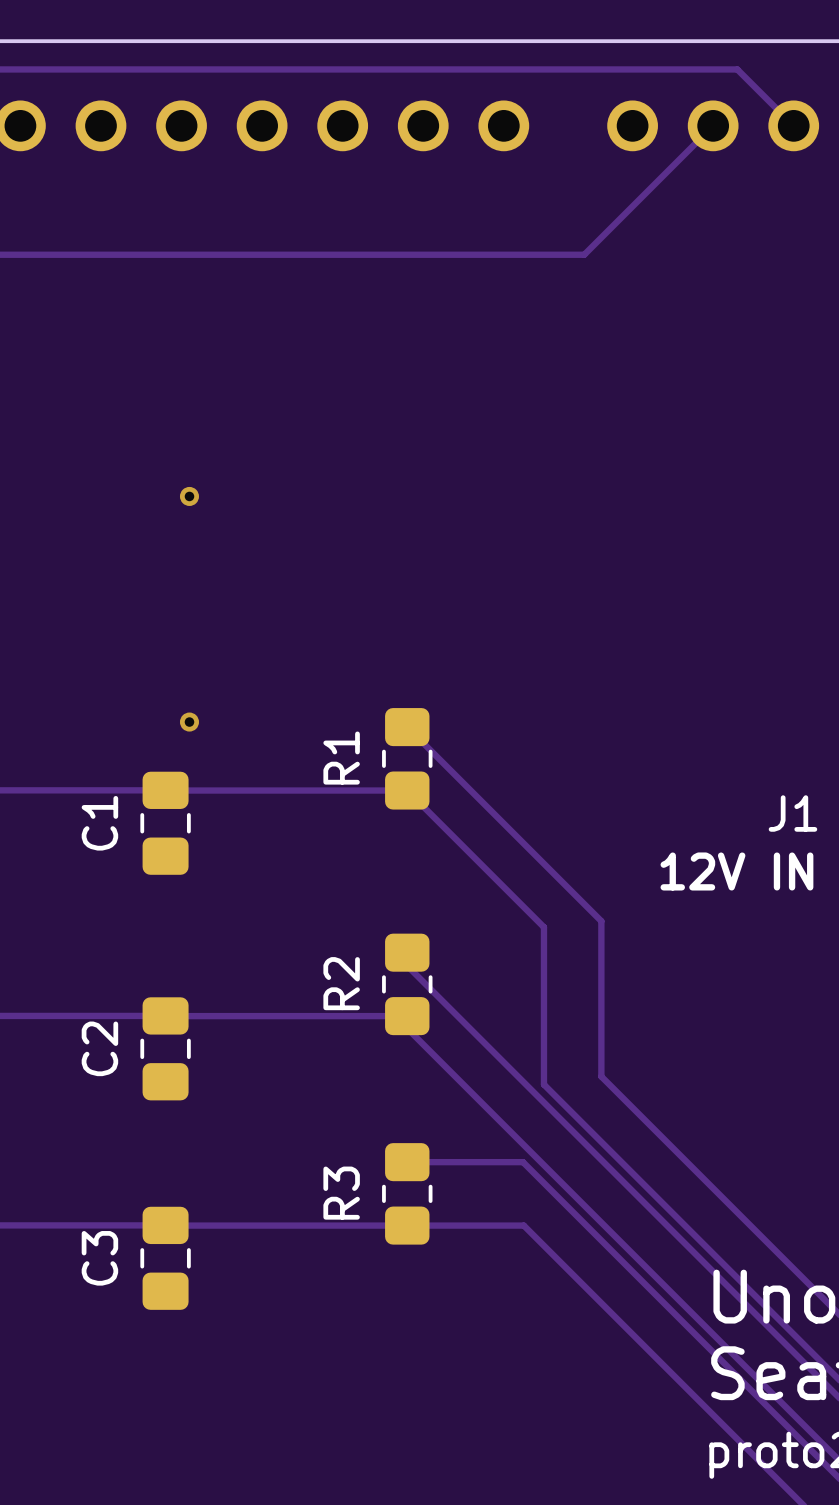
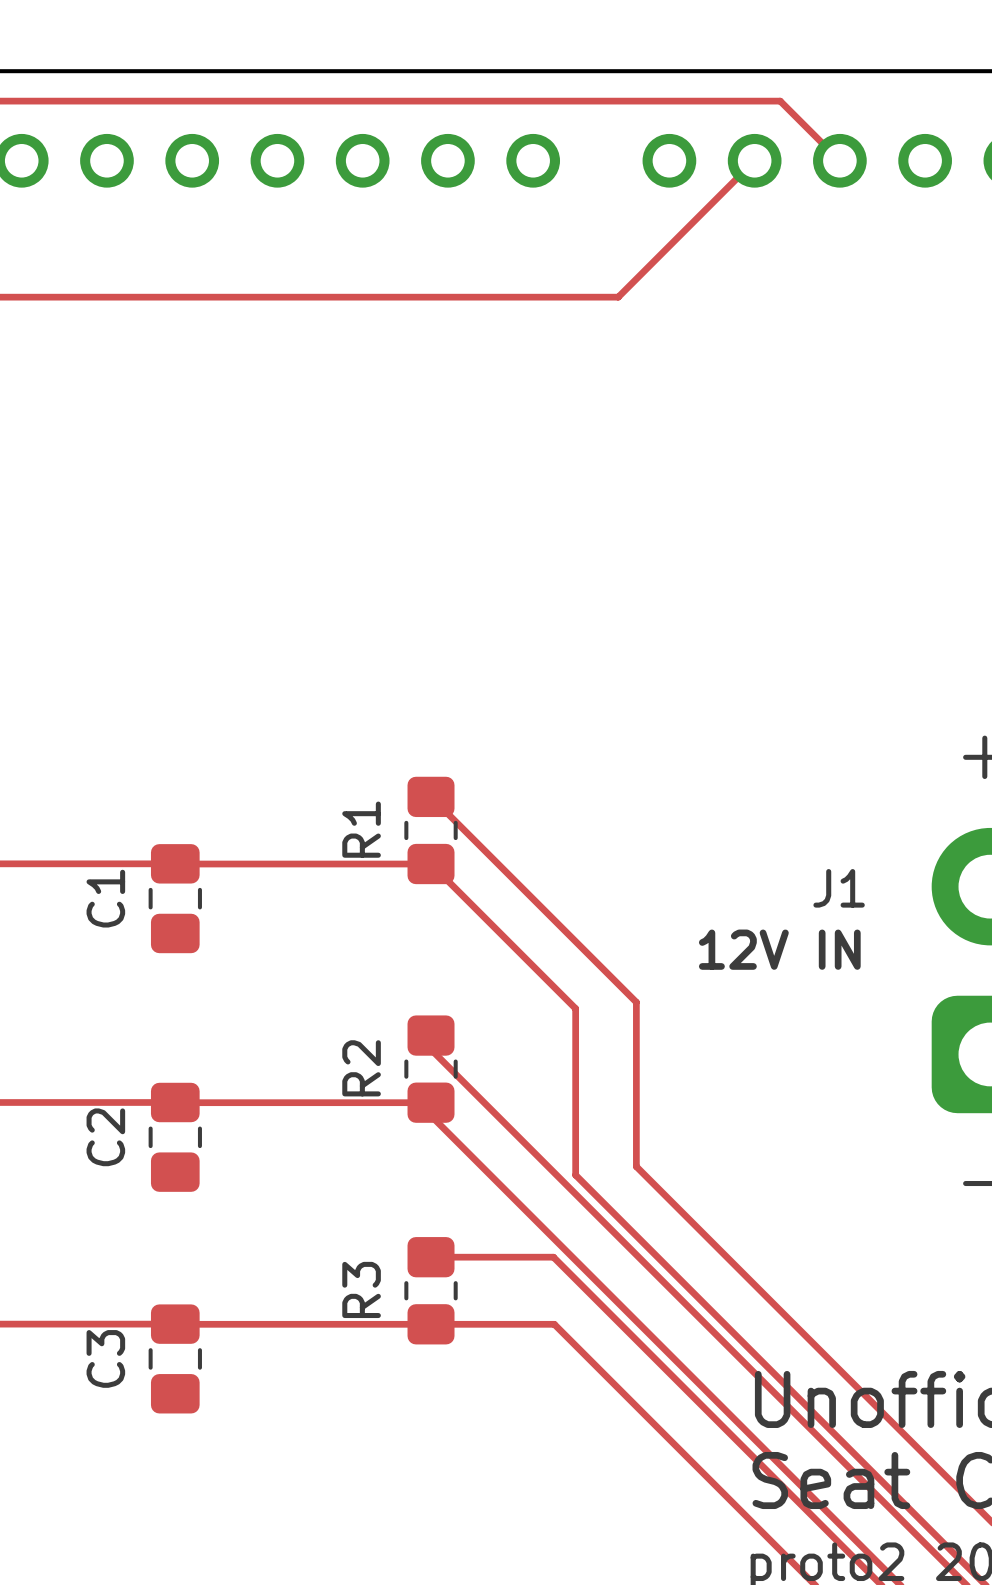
via: (189, 496) -> none
via: (189, 722) -> none

